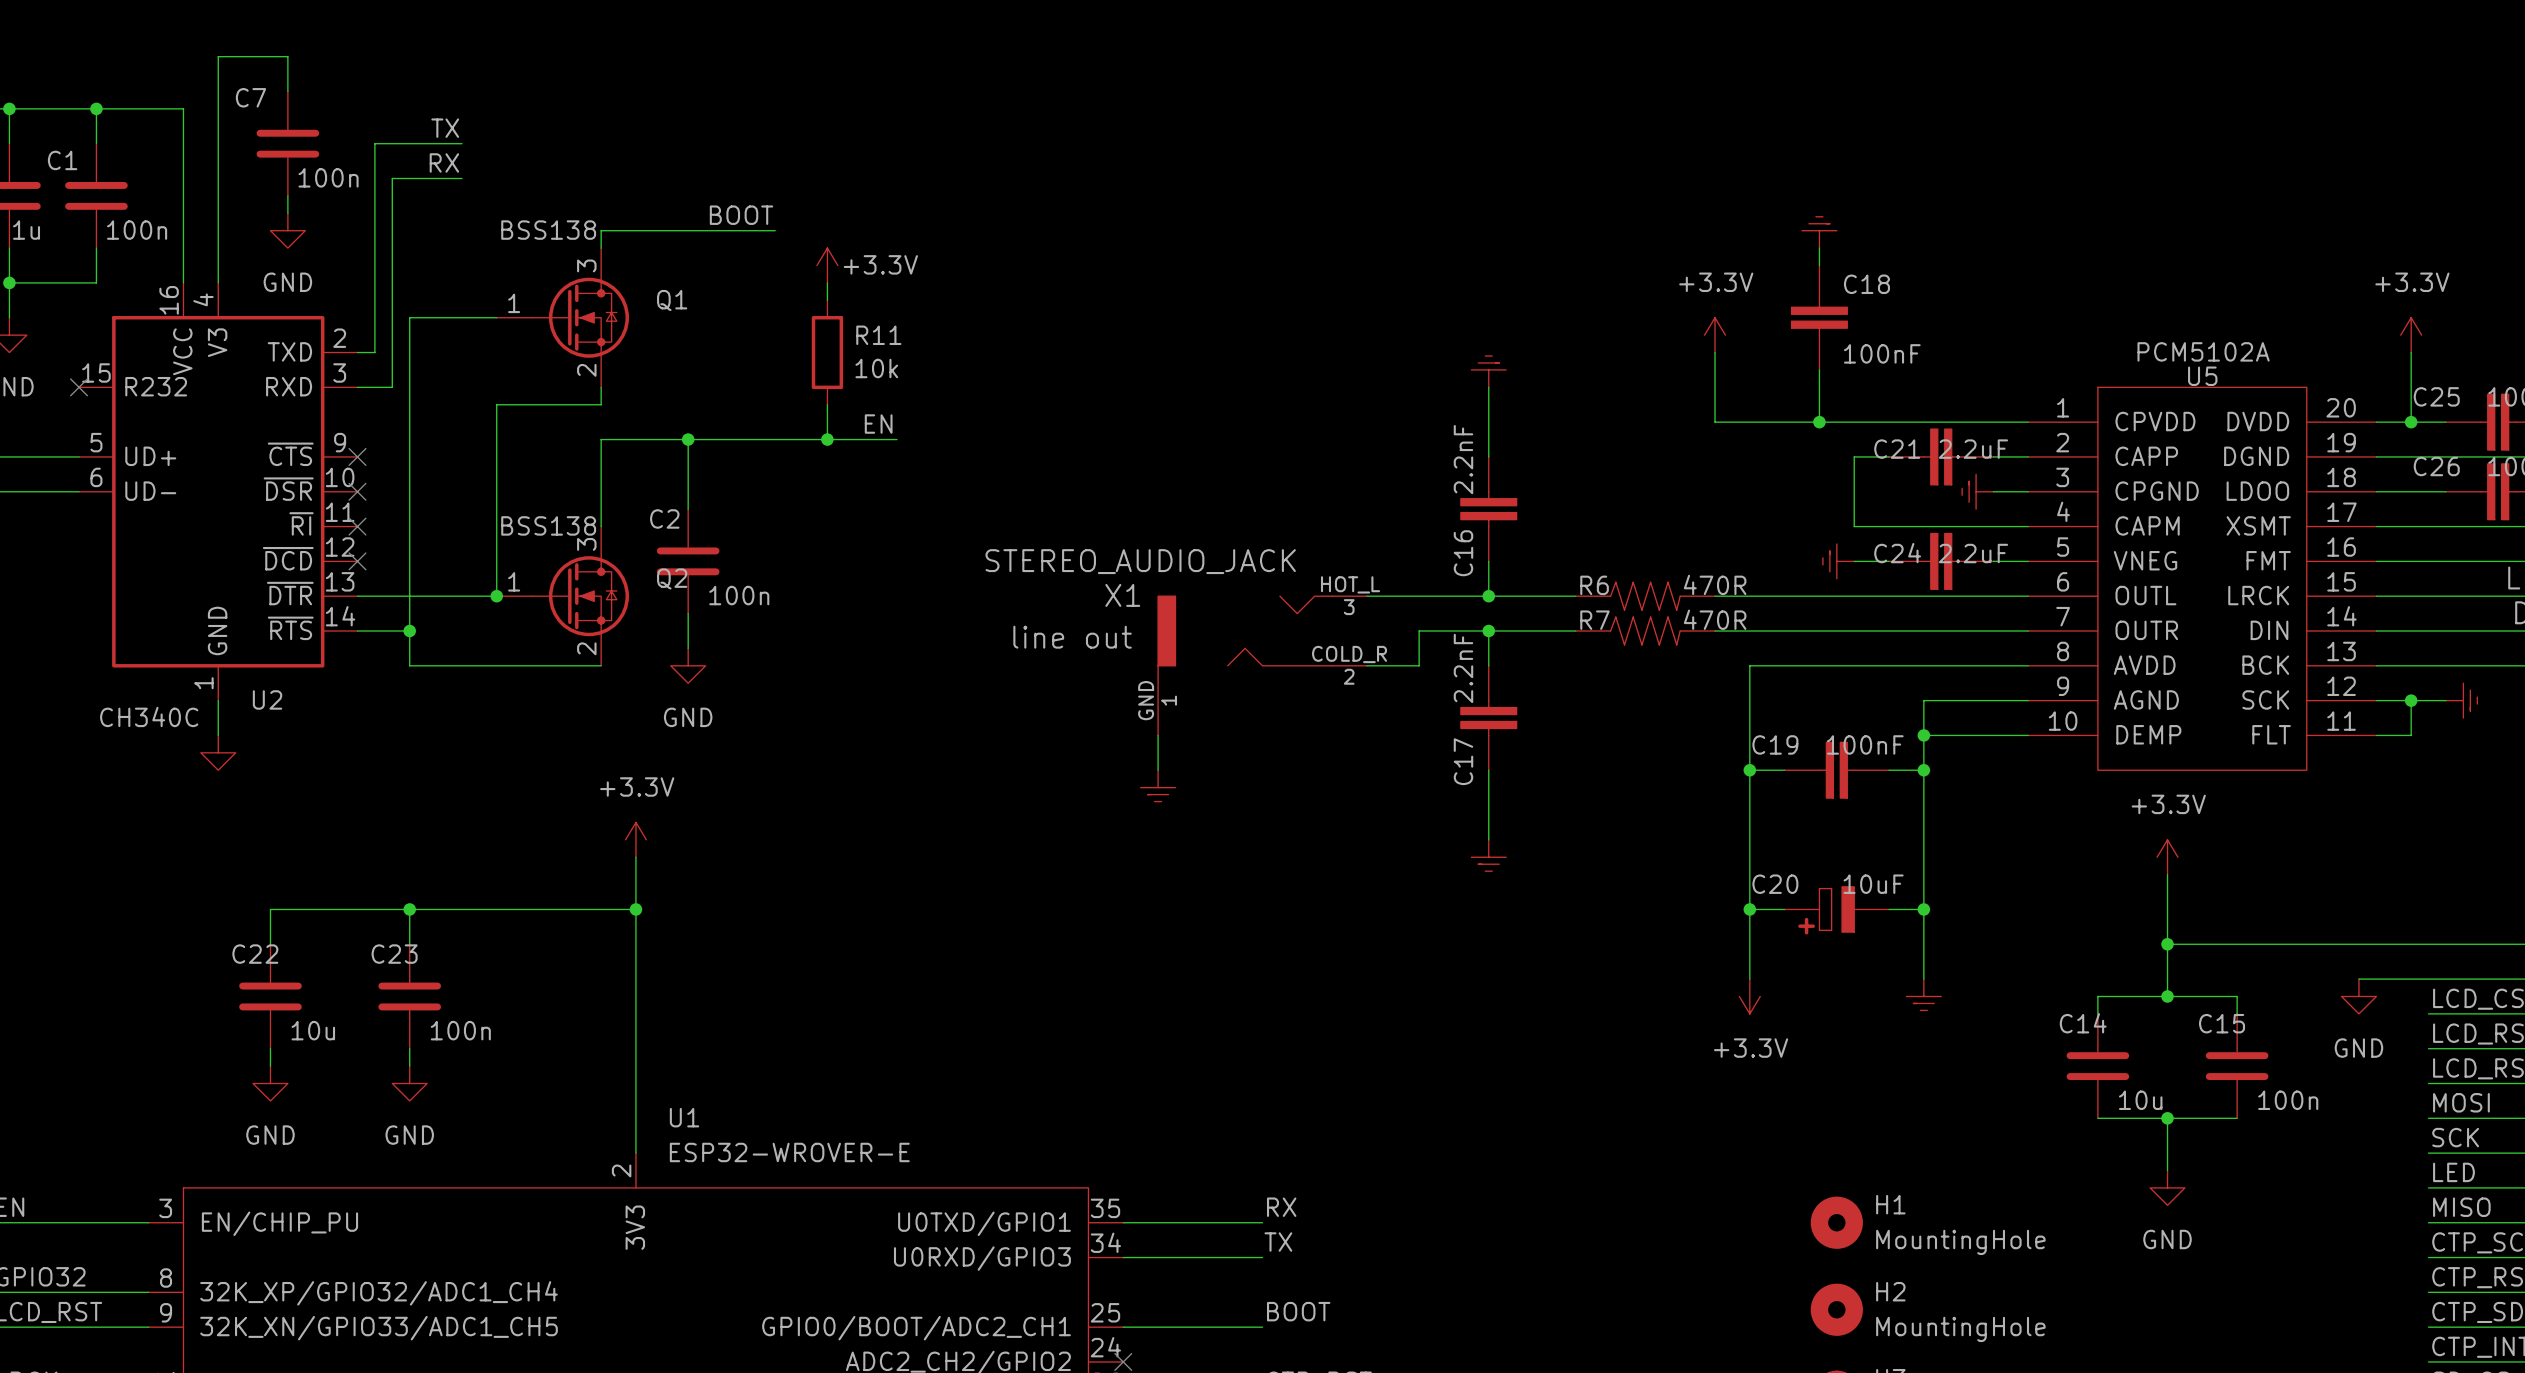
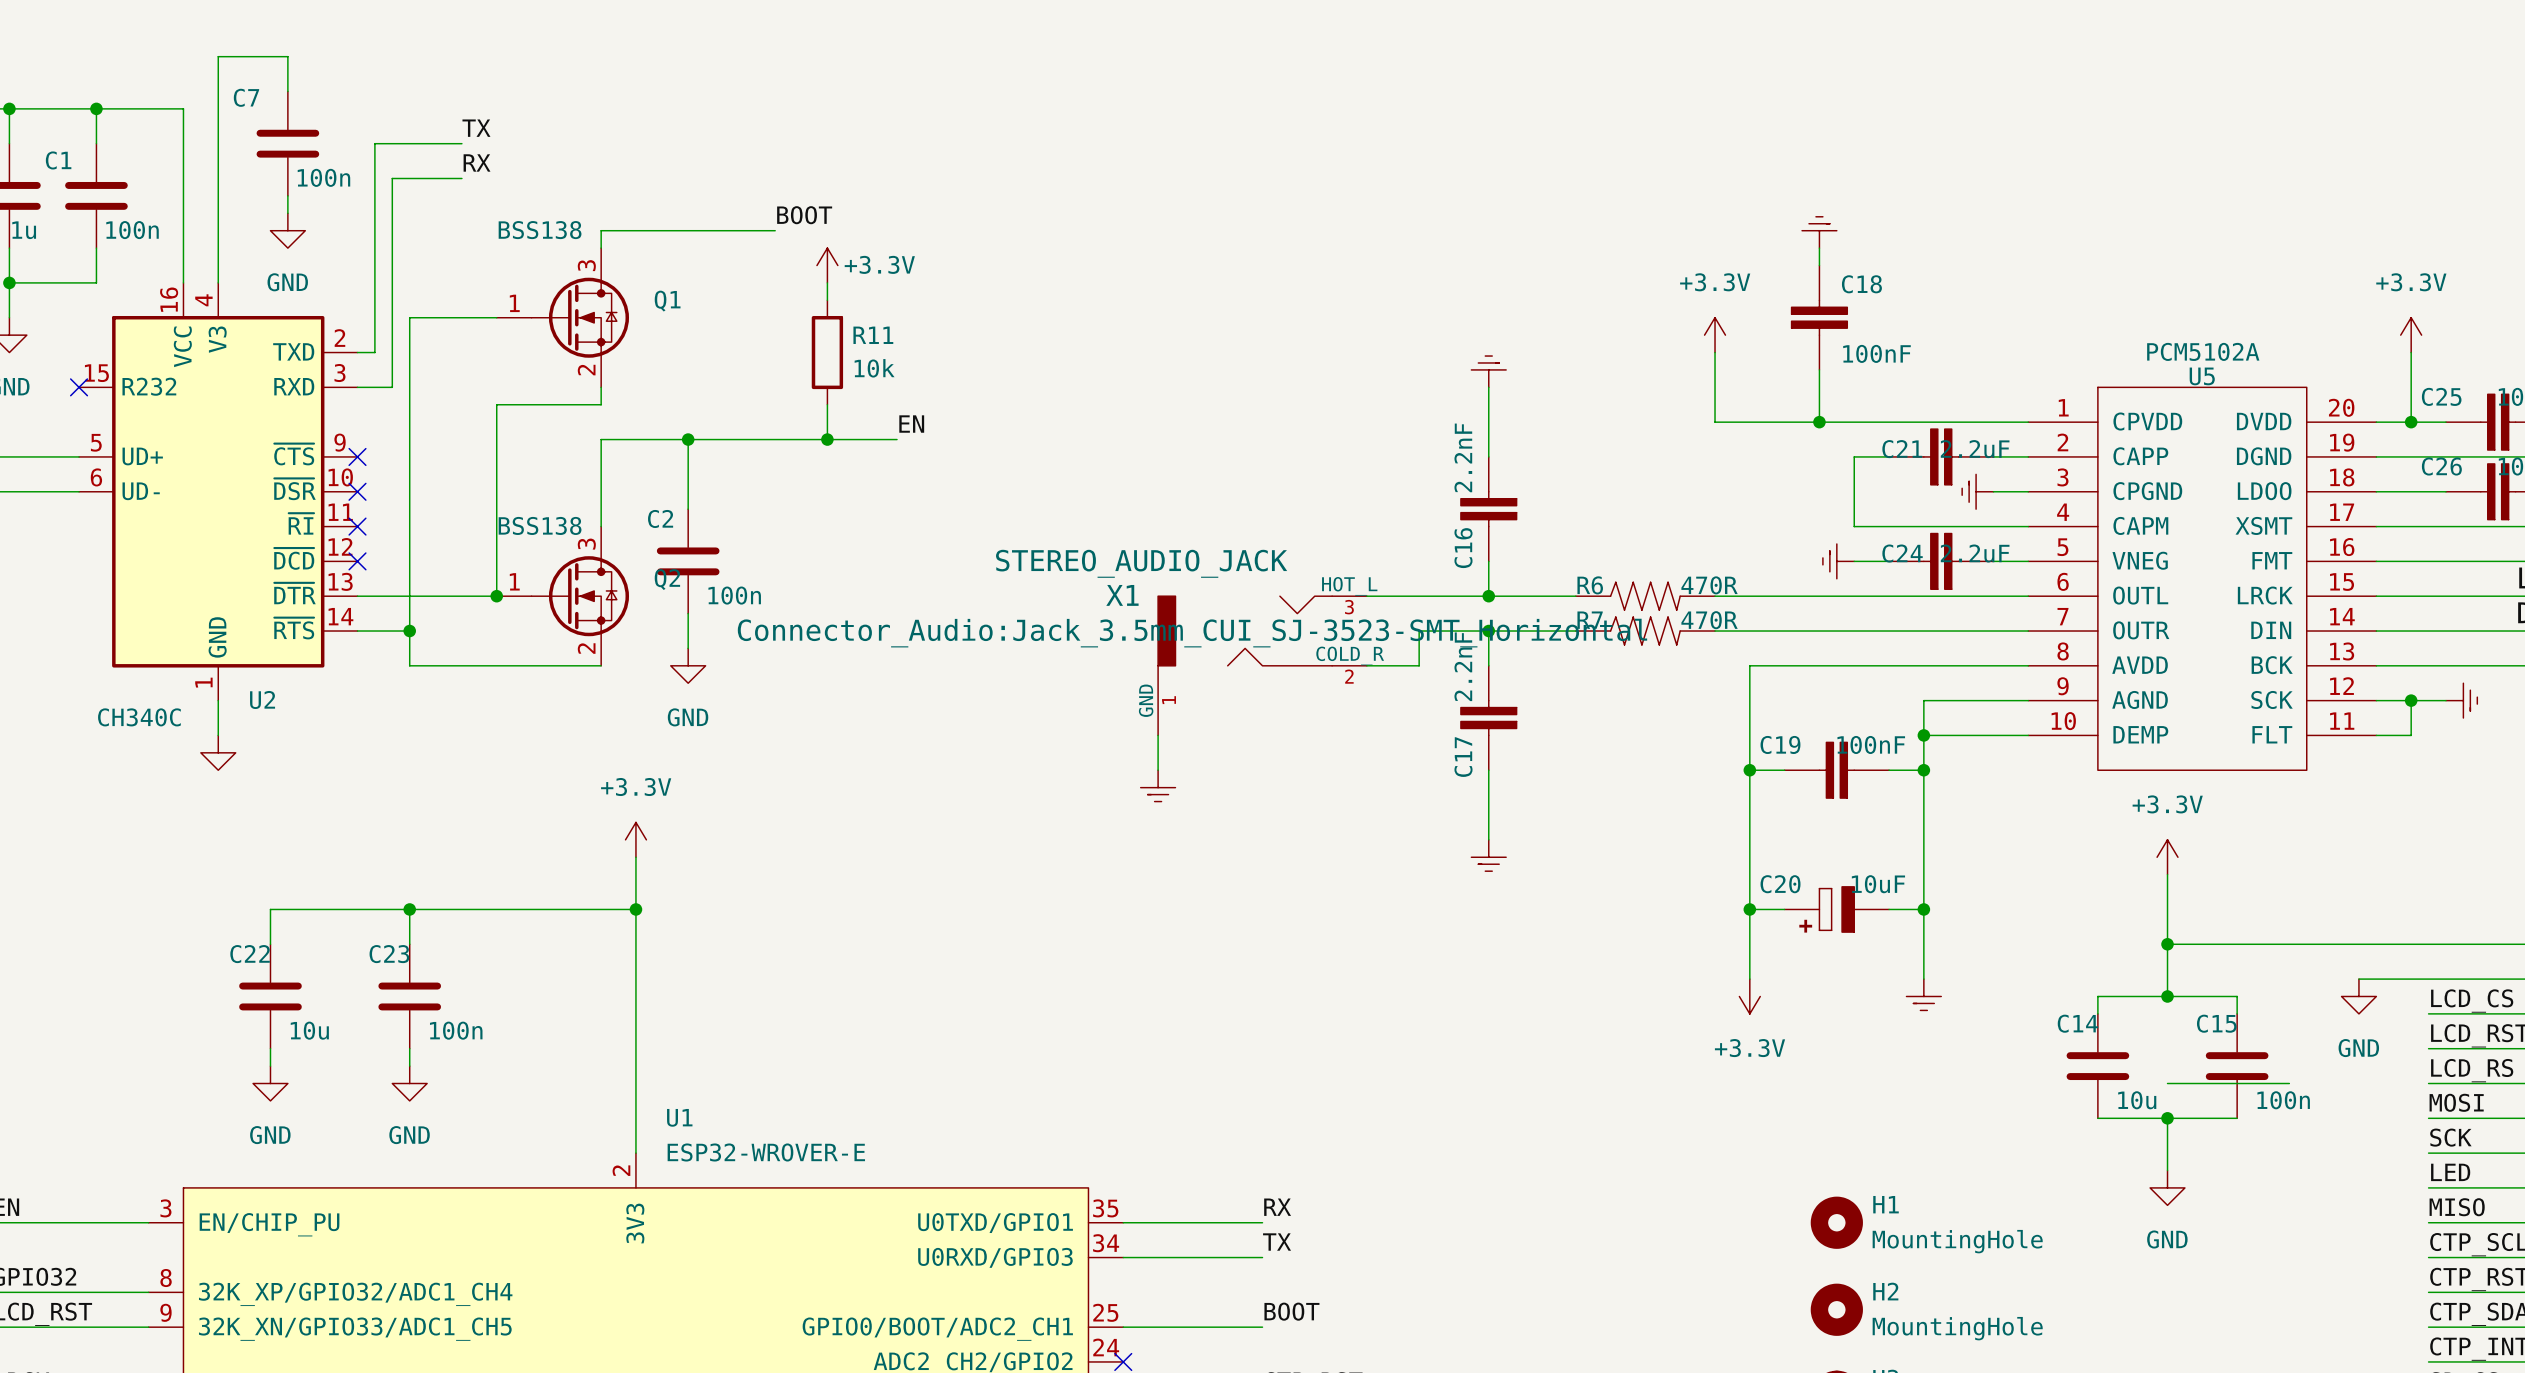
label position: TX (445, 128) -> TX (476, 128)
label position: RX (444, 162) -> RX (477, 162)
label position: BOOT (741, 215) -> BOOT (804, 215)
label position: EN (878, 424) -> EN (911, 424)
X1 text: line out (1072, 637) -> Connector_Audio:Jack_3.5mm_CUI_SJ-3523-SMT_Horizontal (1192, 633)
wire: none -> (2167, 1083) (2289, 1083)

